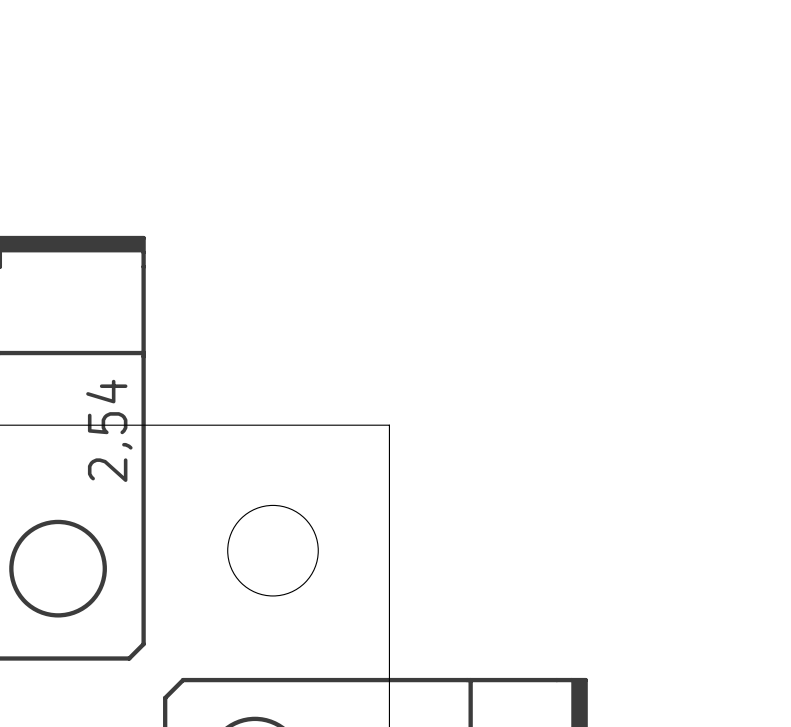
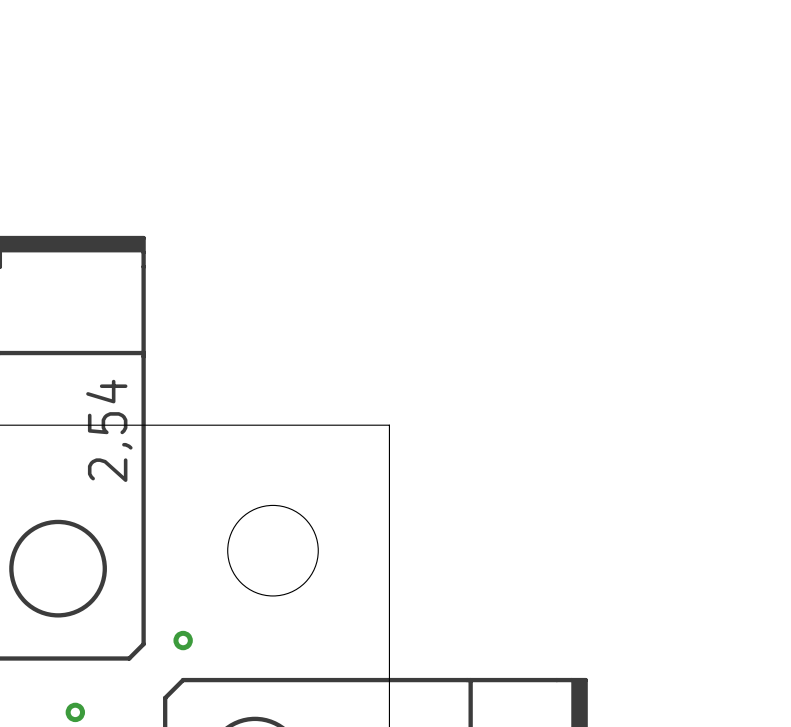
via: none -> (183, 640)
via: none -> (75, 712)

